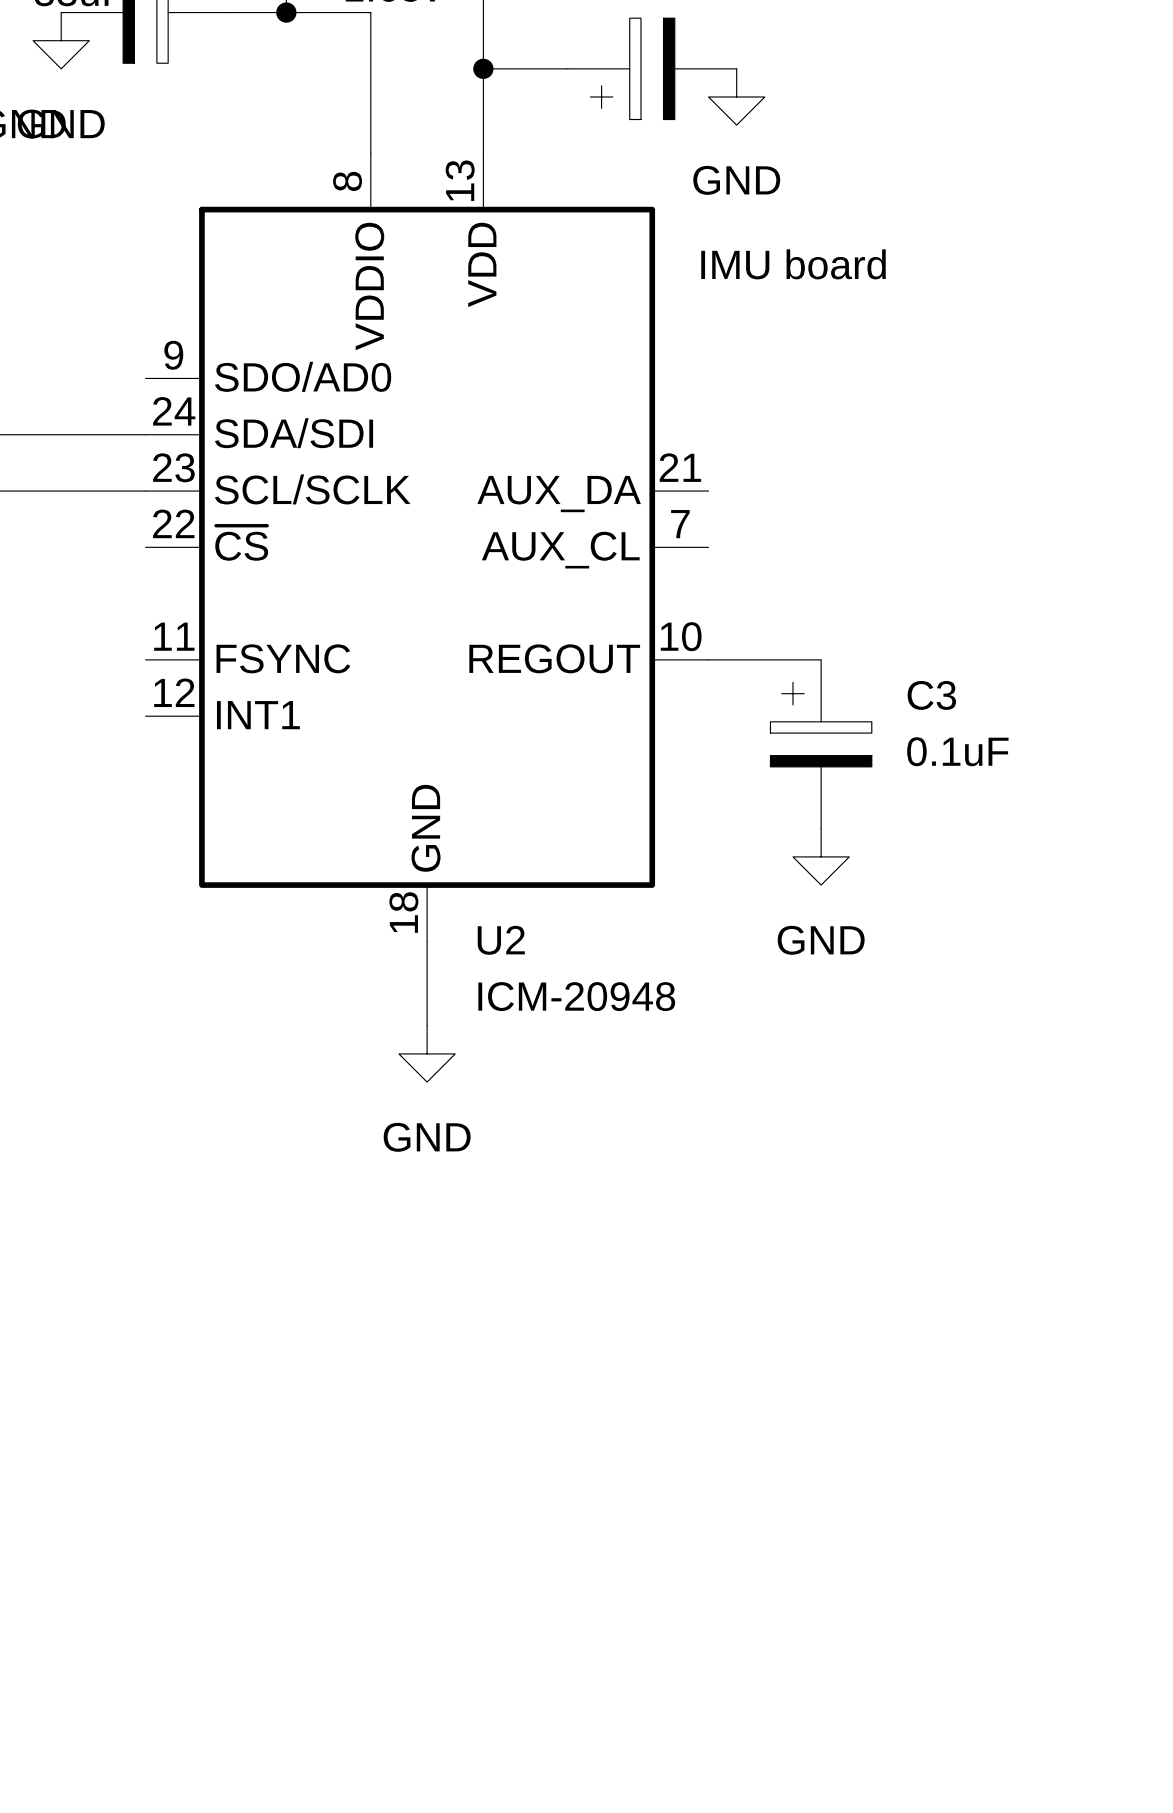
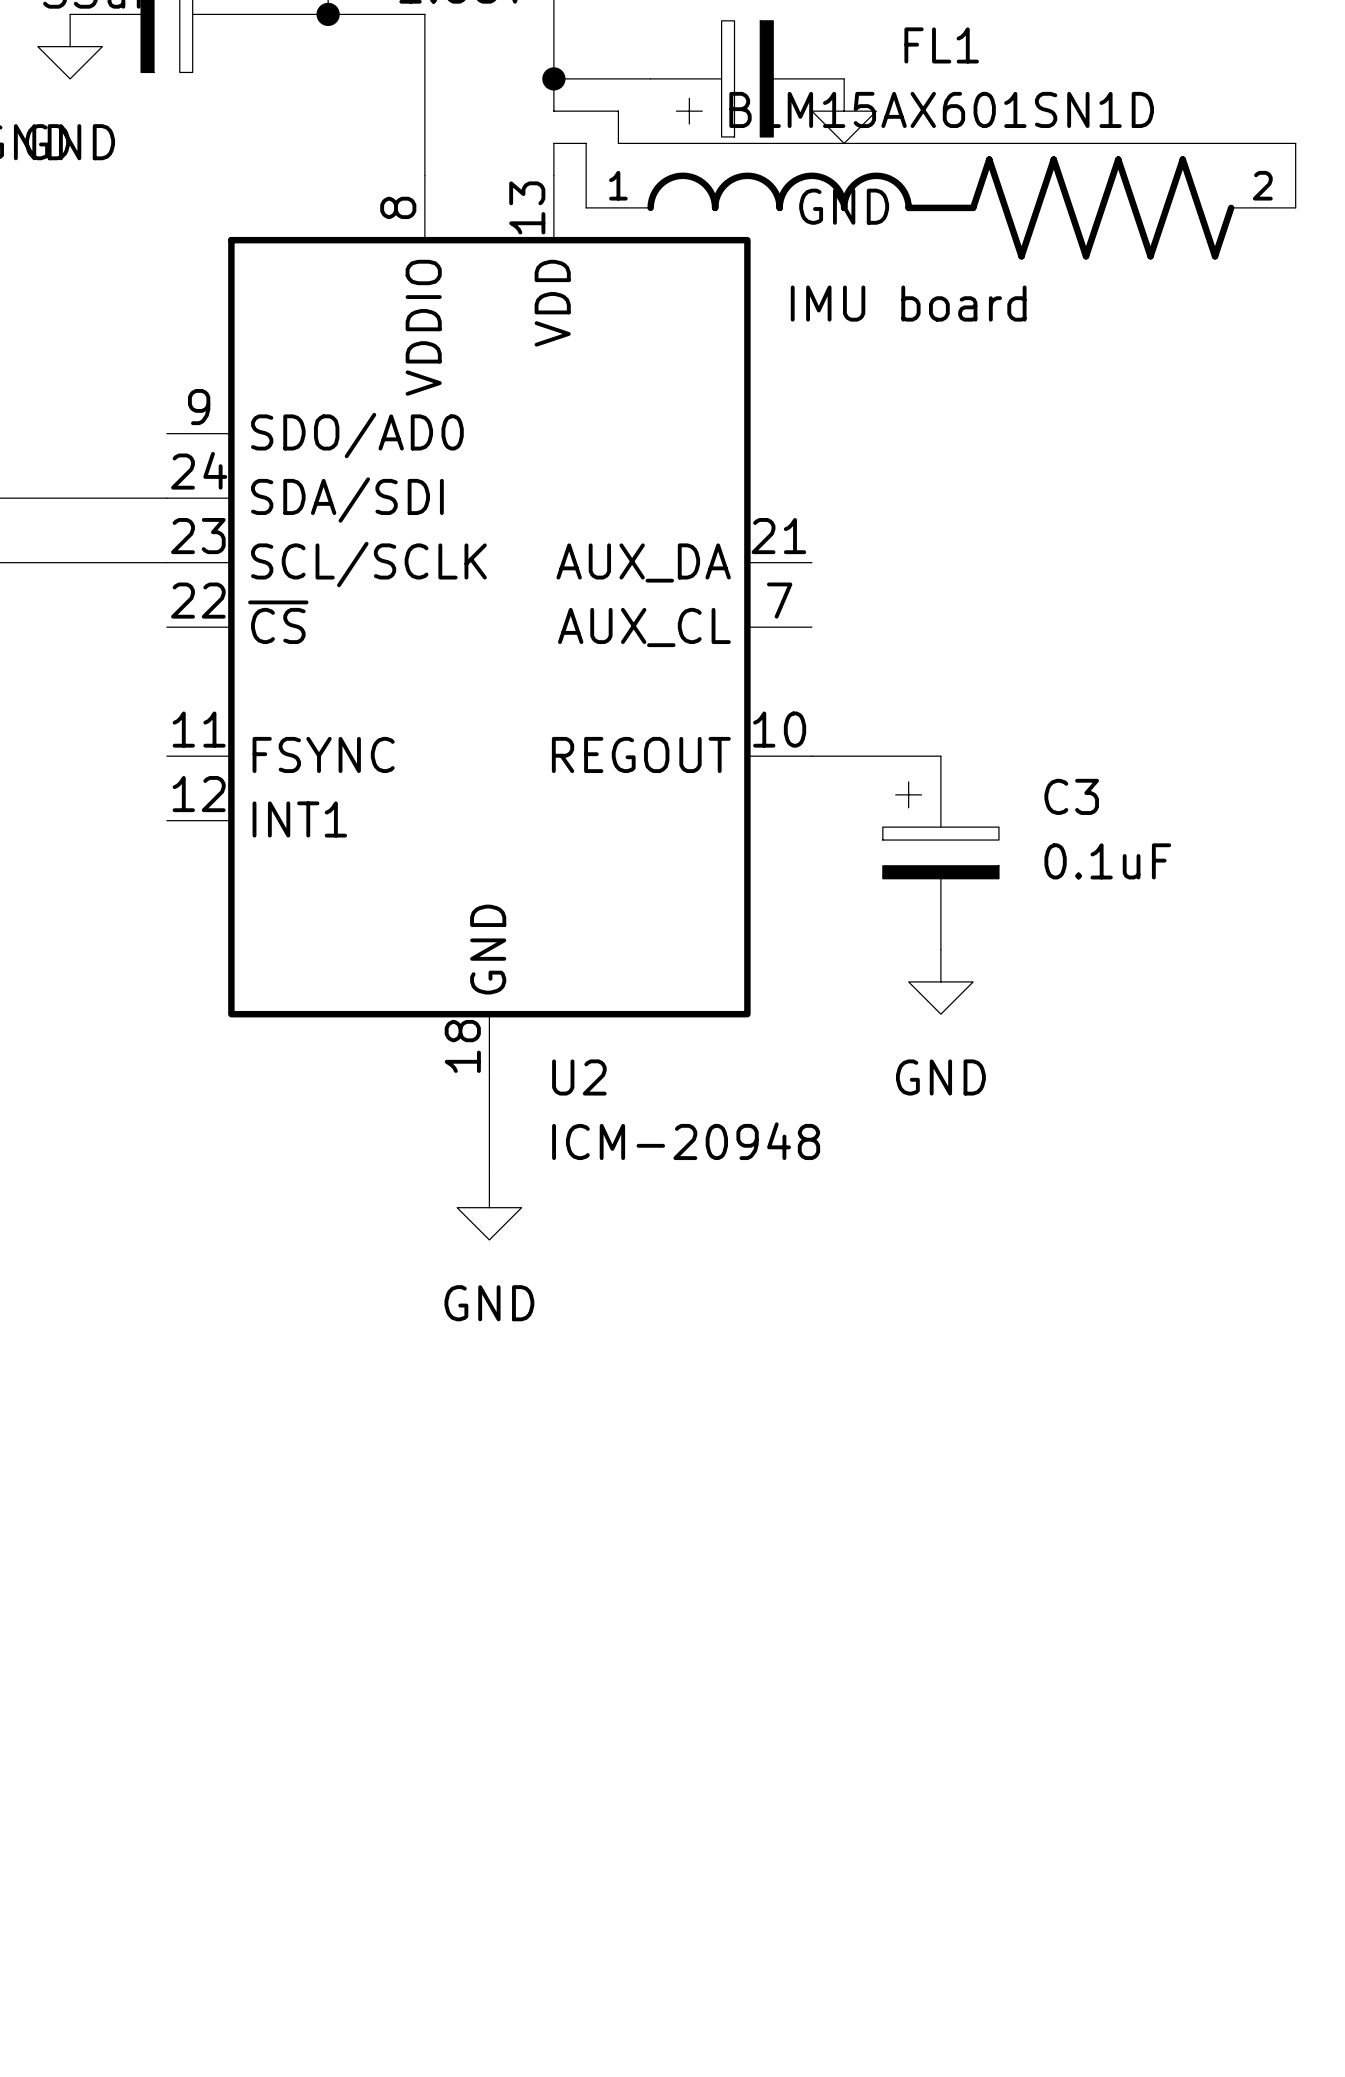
wire: (483, 97) (483, 125) -> (586, 207) (586, 143) (553, 143)
wire: none -> (553, 111) (618, 111) (618, 143) (1295, 143) (1295, 207)
FL1: none -> BLM15AX601SN1D (940, 207)

